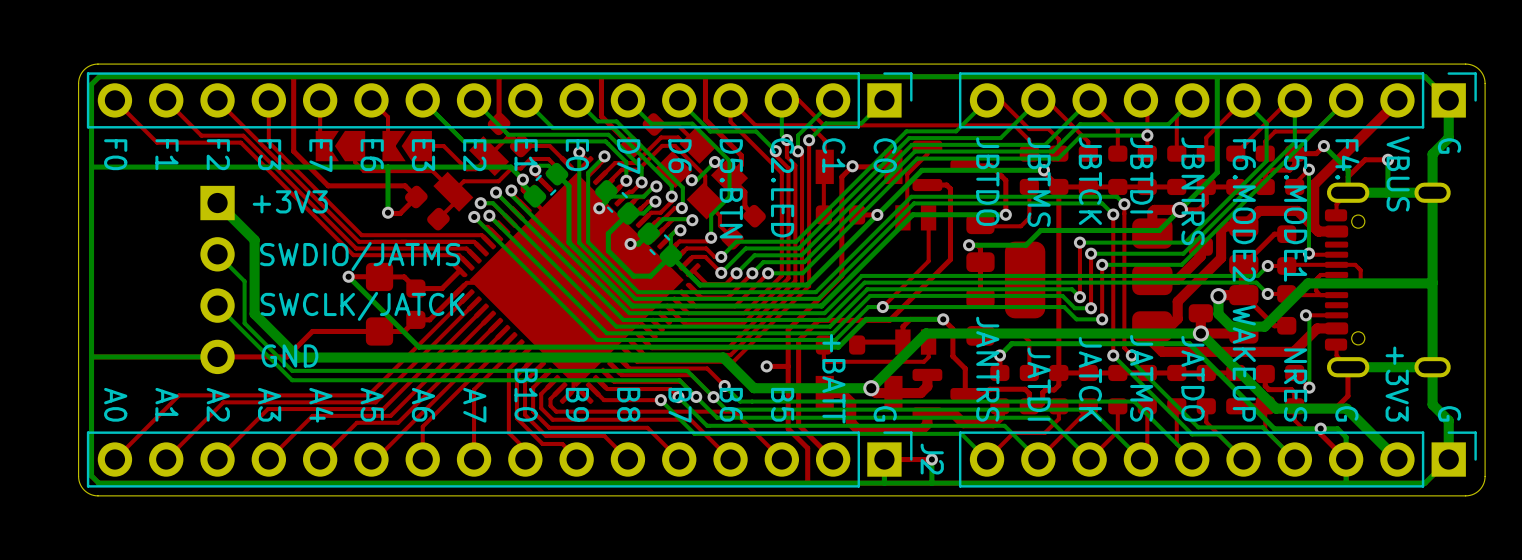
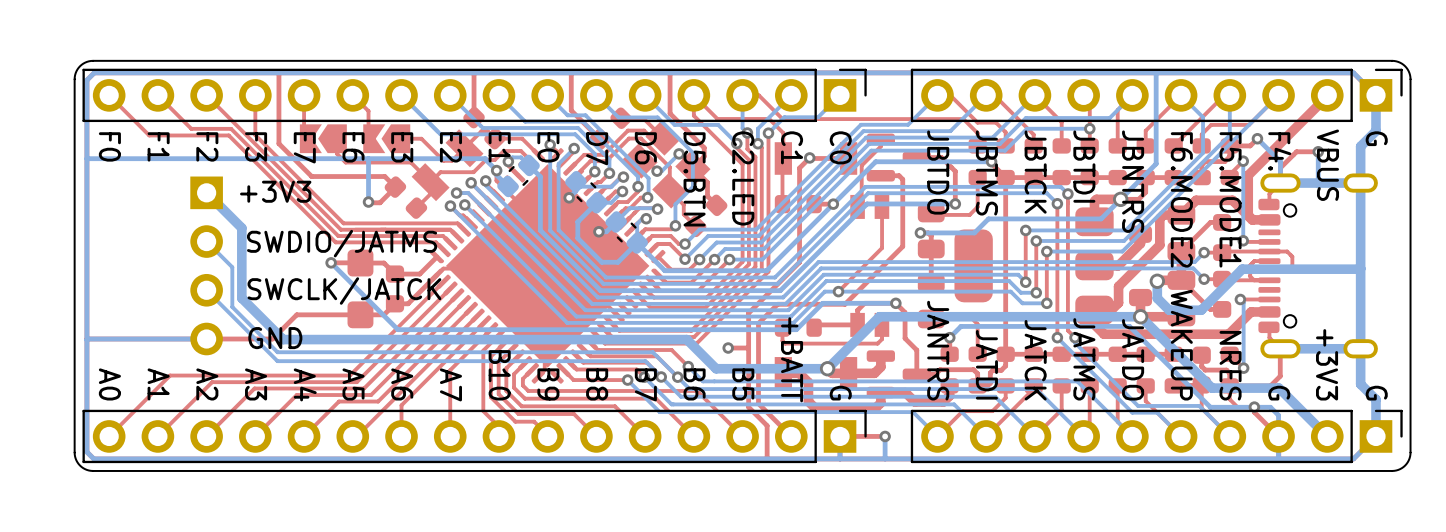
J2 name: J2 (932, 459) -> none

